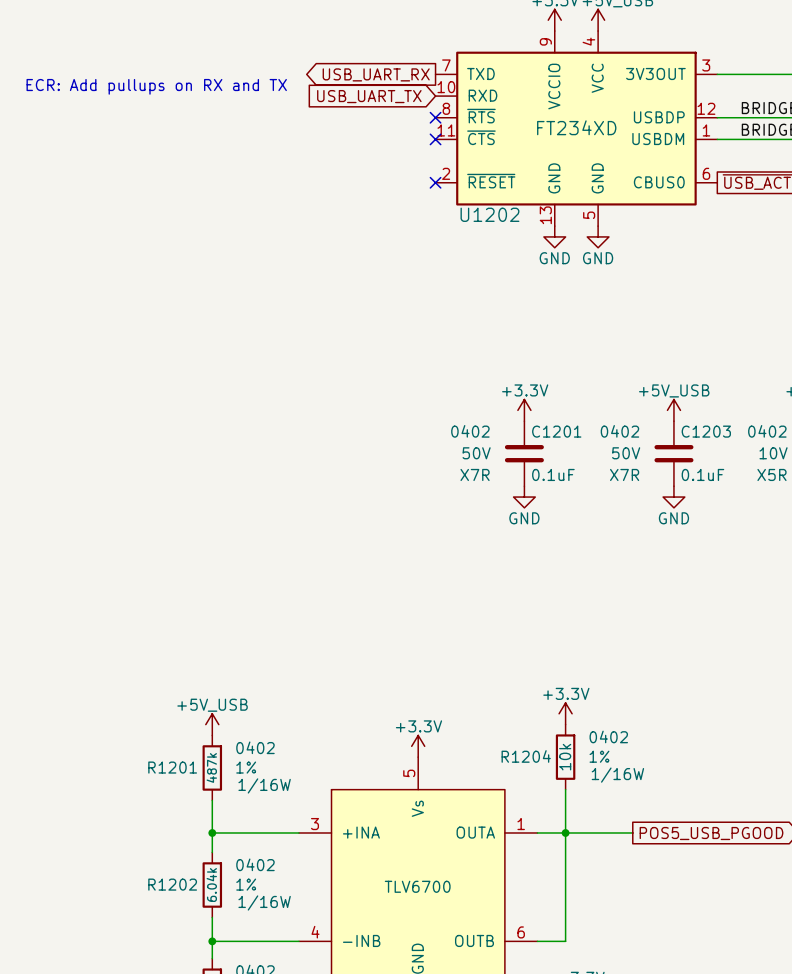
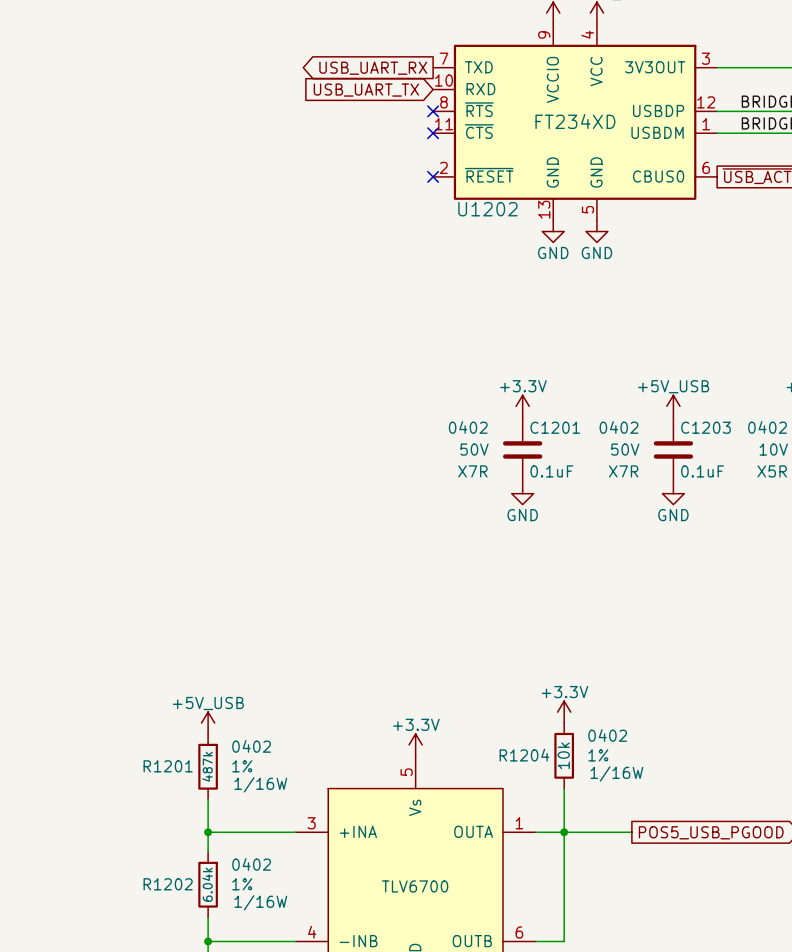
text: ECR: Add pullups on RX and TX (156, 86) -> none

